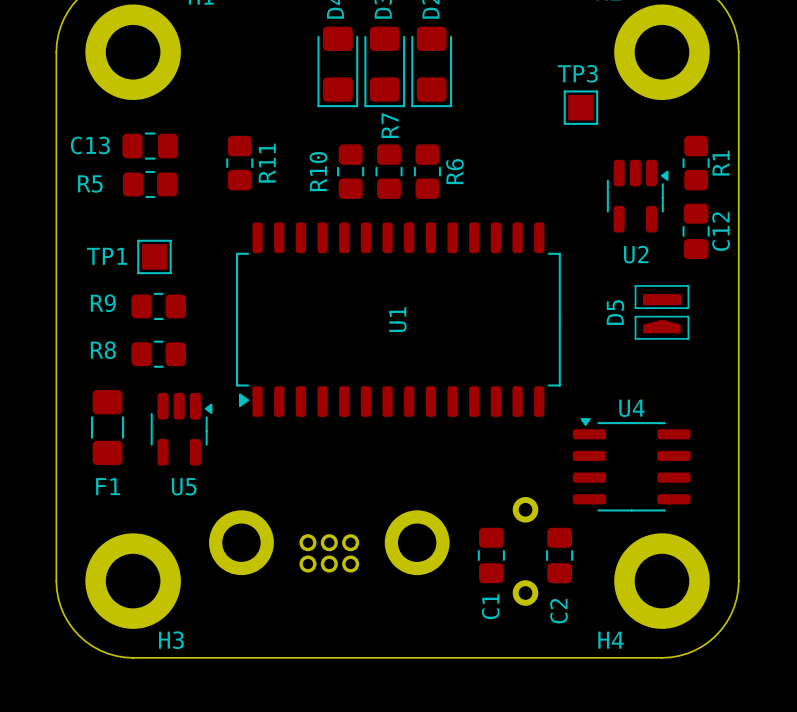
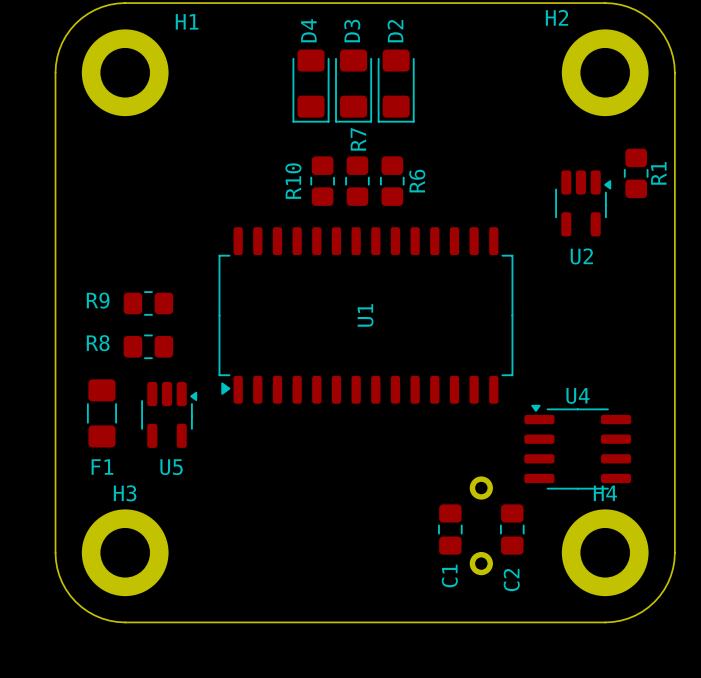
TP3: (580, 107) -> none
C13: (150, 146) -> none
R11: (239, 163) -> none
R5: (150, 184) -> none
C12: (696, 231) -> none
TP1: (154, 256) -> none
D5: (661, 312) -> none
part: (329, 542) -> none
H3 name position: H3 (171, 640) -> H3 (125, 493)
H4 name position: H4 (611, 640) -> H4 (605, 493)

